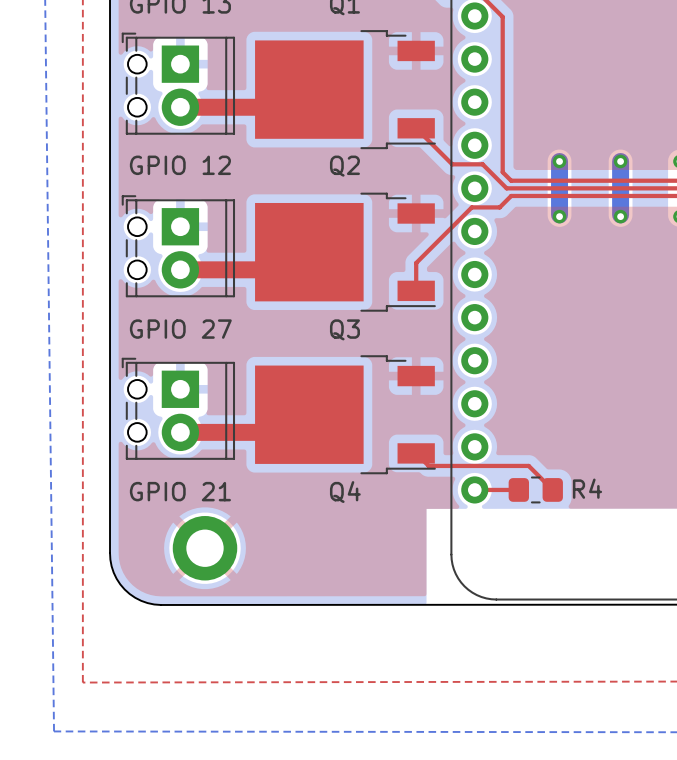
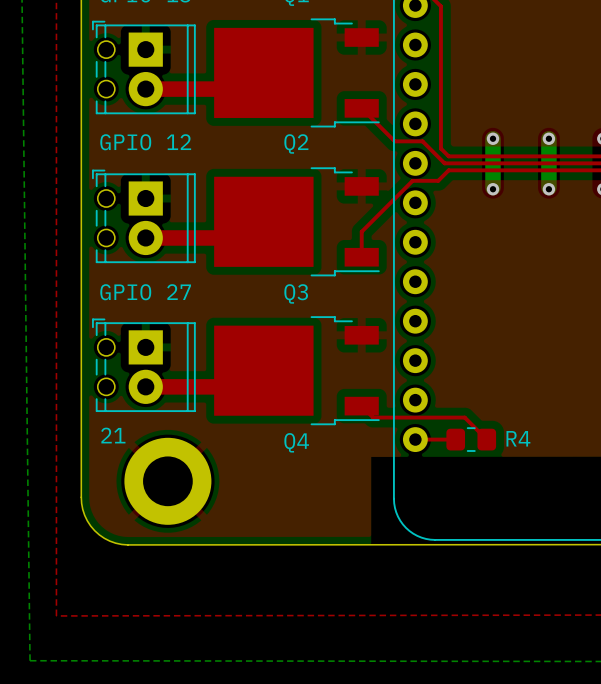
part value: GPIO 21 (180, 491) -> 21 (113, 435)
part footprint: [172, 516, 238, 581] -> [124, 437, 212, 525]

